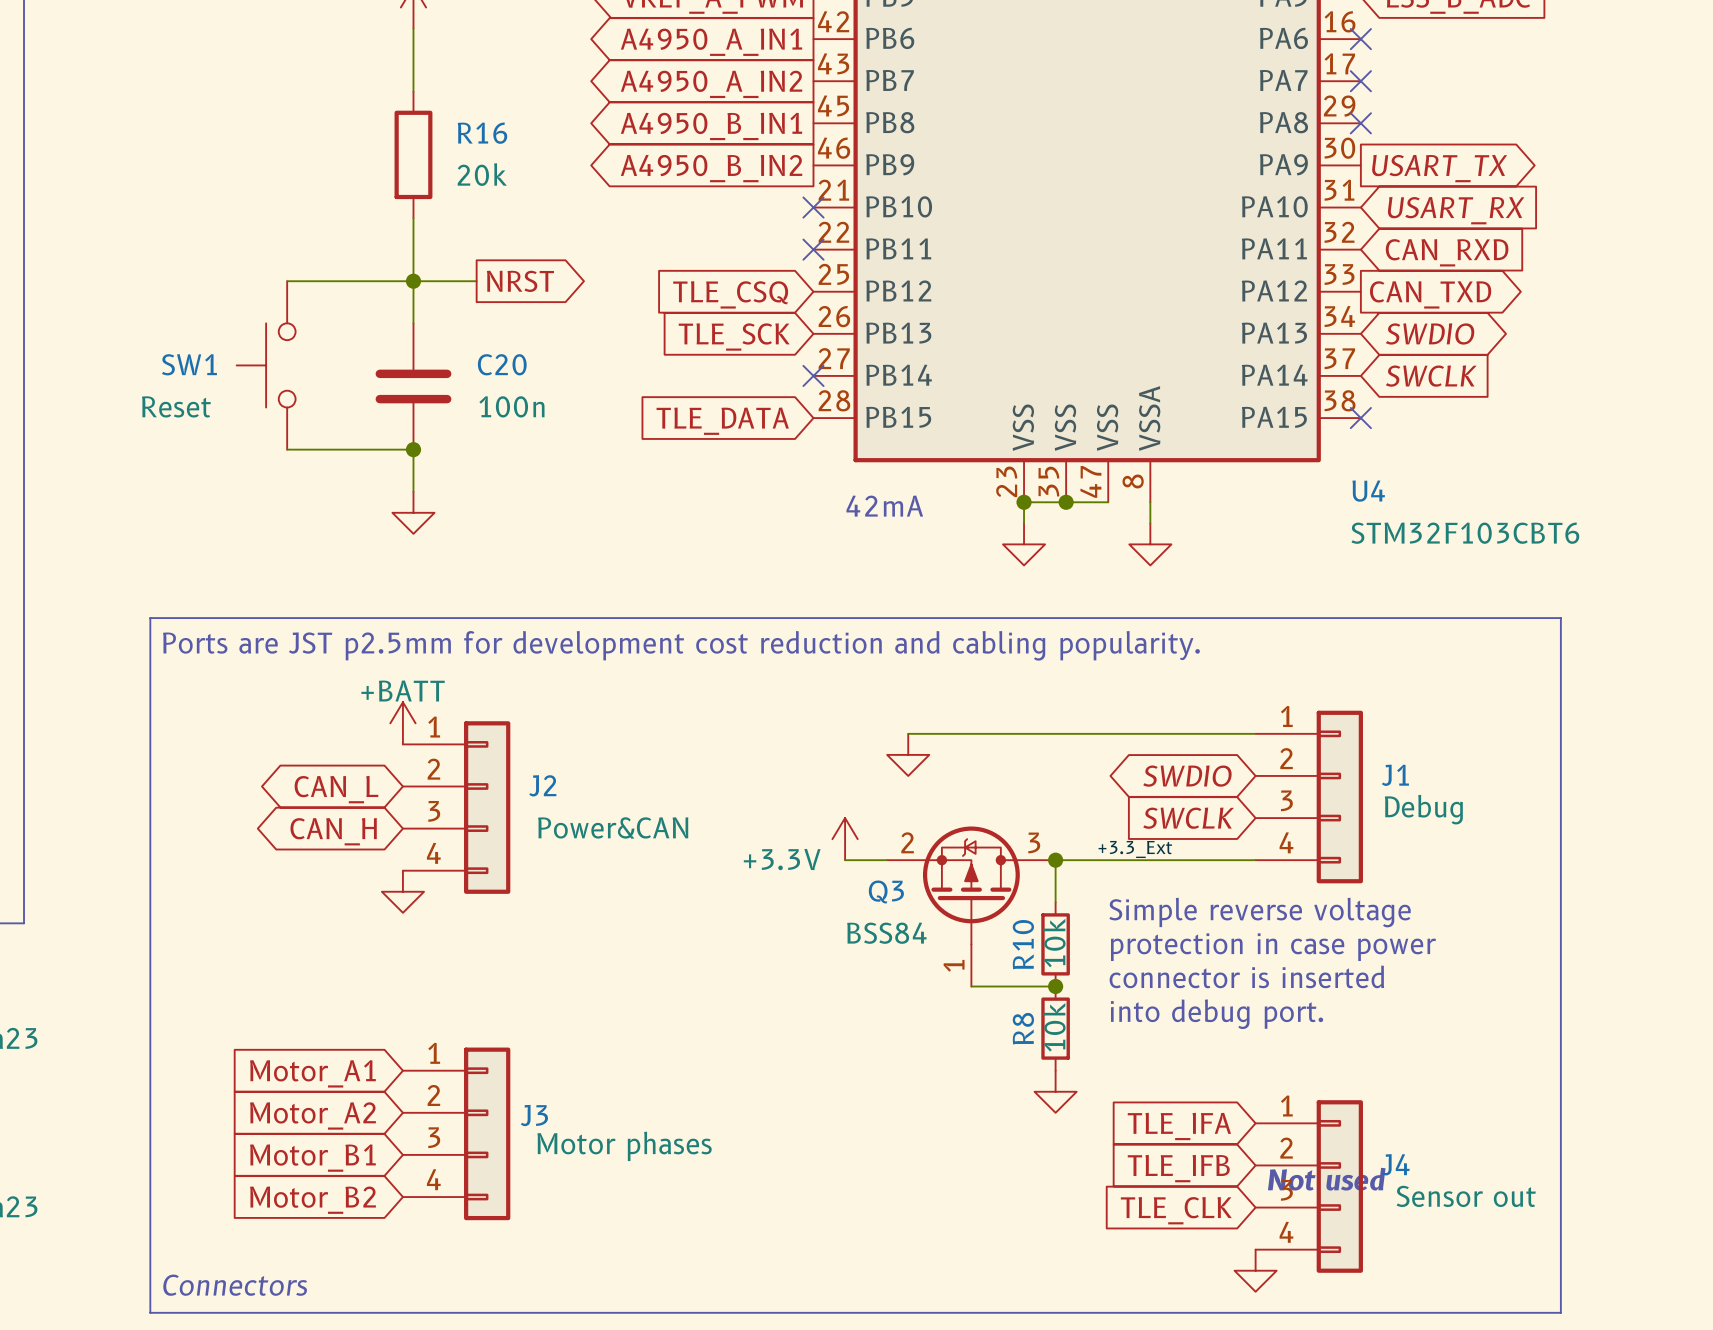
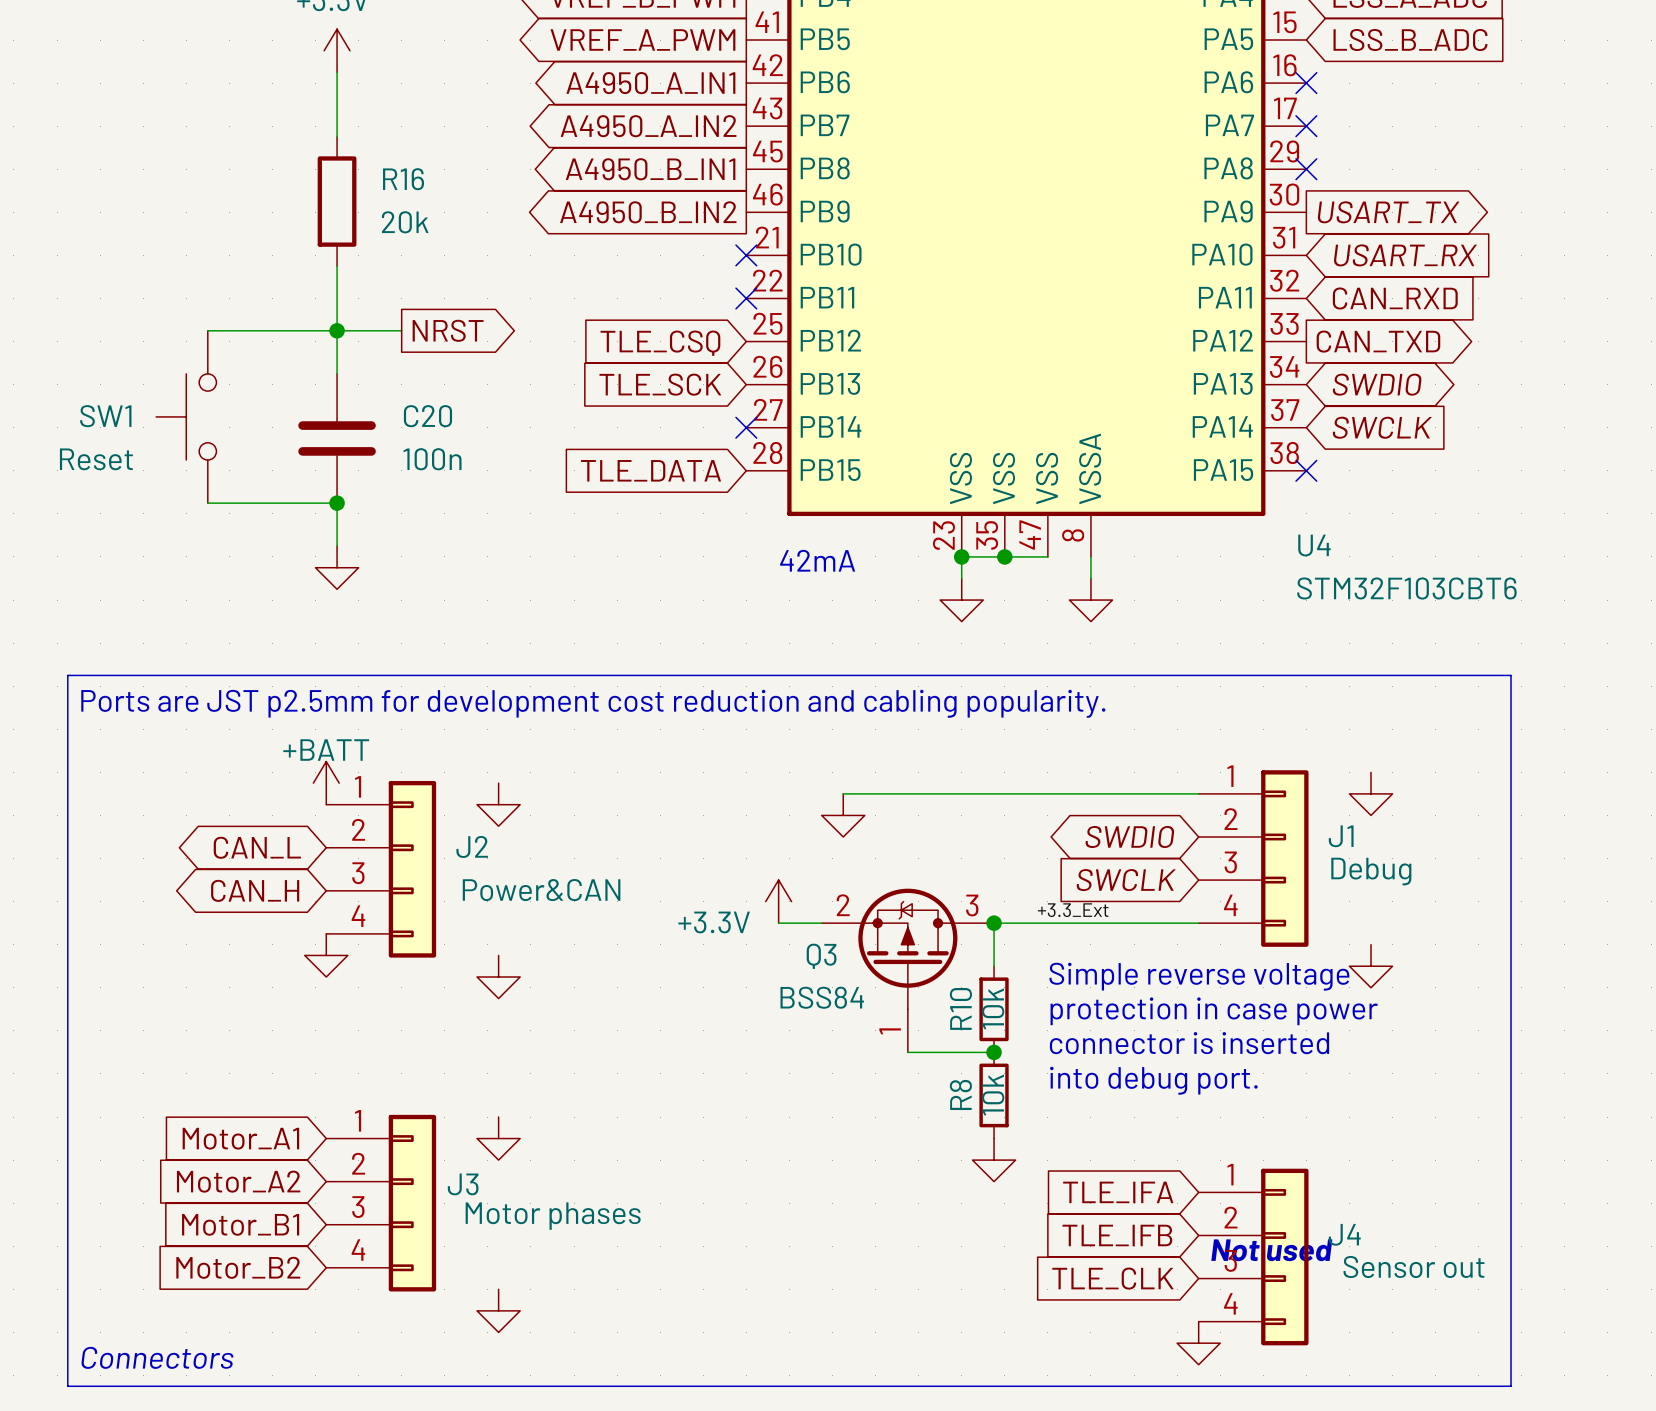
power symbol: none -> (1370, 793)
power symbol: none -> (498, 804)
power symbol: none -> (1370, 966)
power symbol: none -> (498, 977)
power symbol: none -> (498, 1138)
power symbol: none -> (498, 1310)

